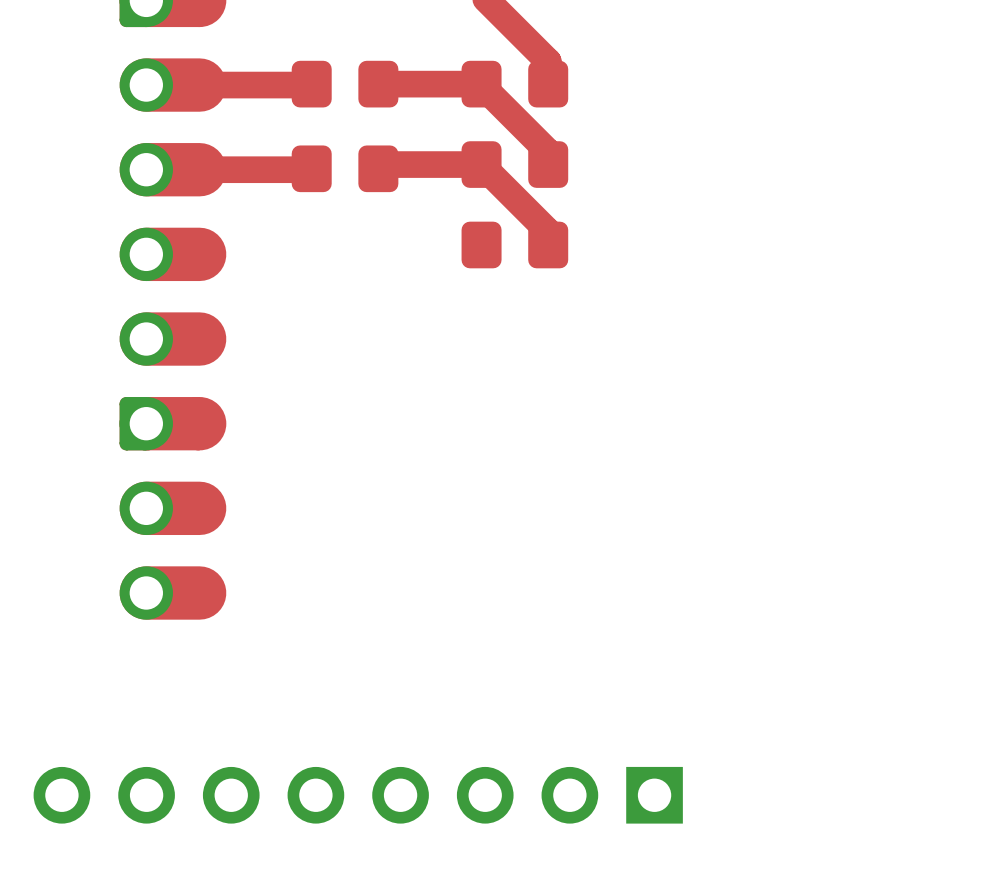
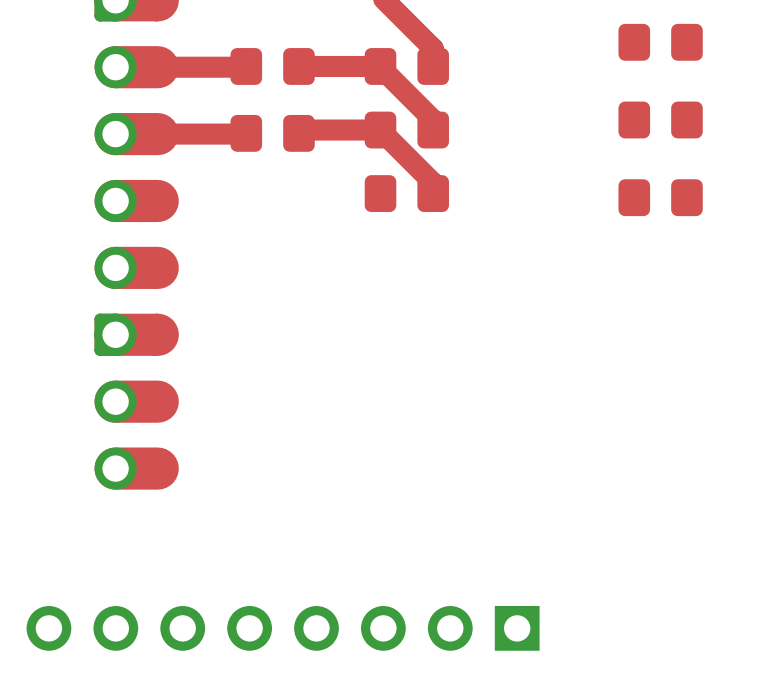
part: none -> (660, 42)
part: none -> (660, 119)
part: none -> (660, 197)

